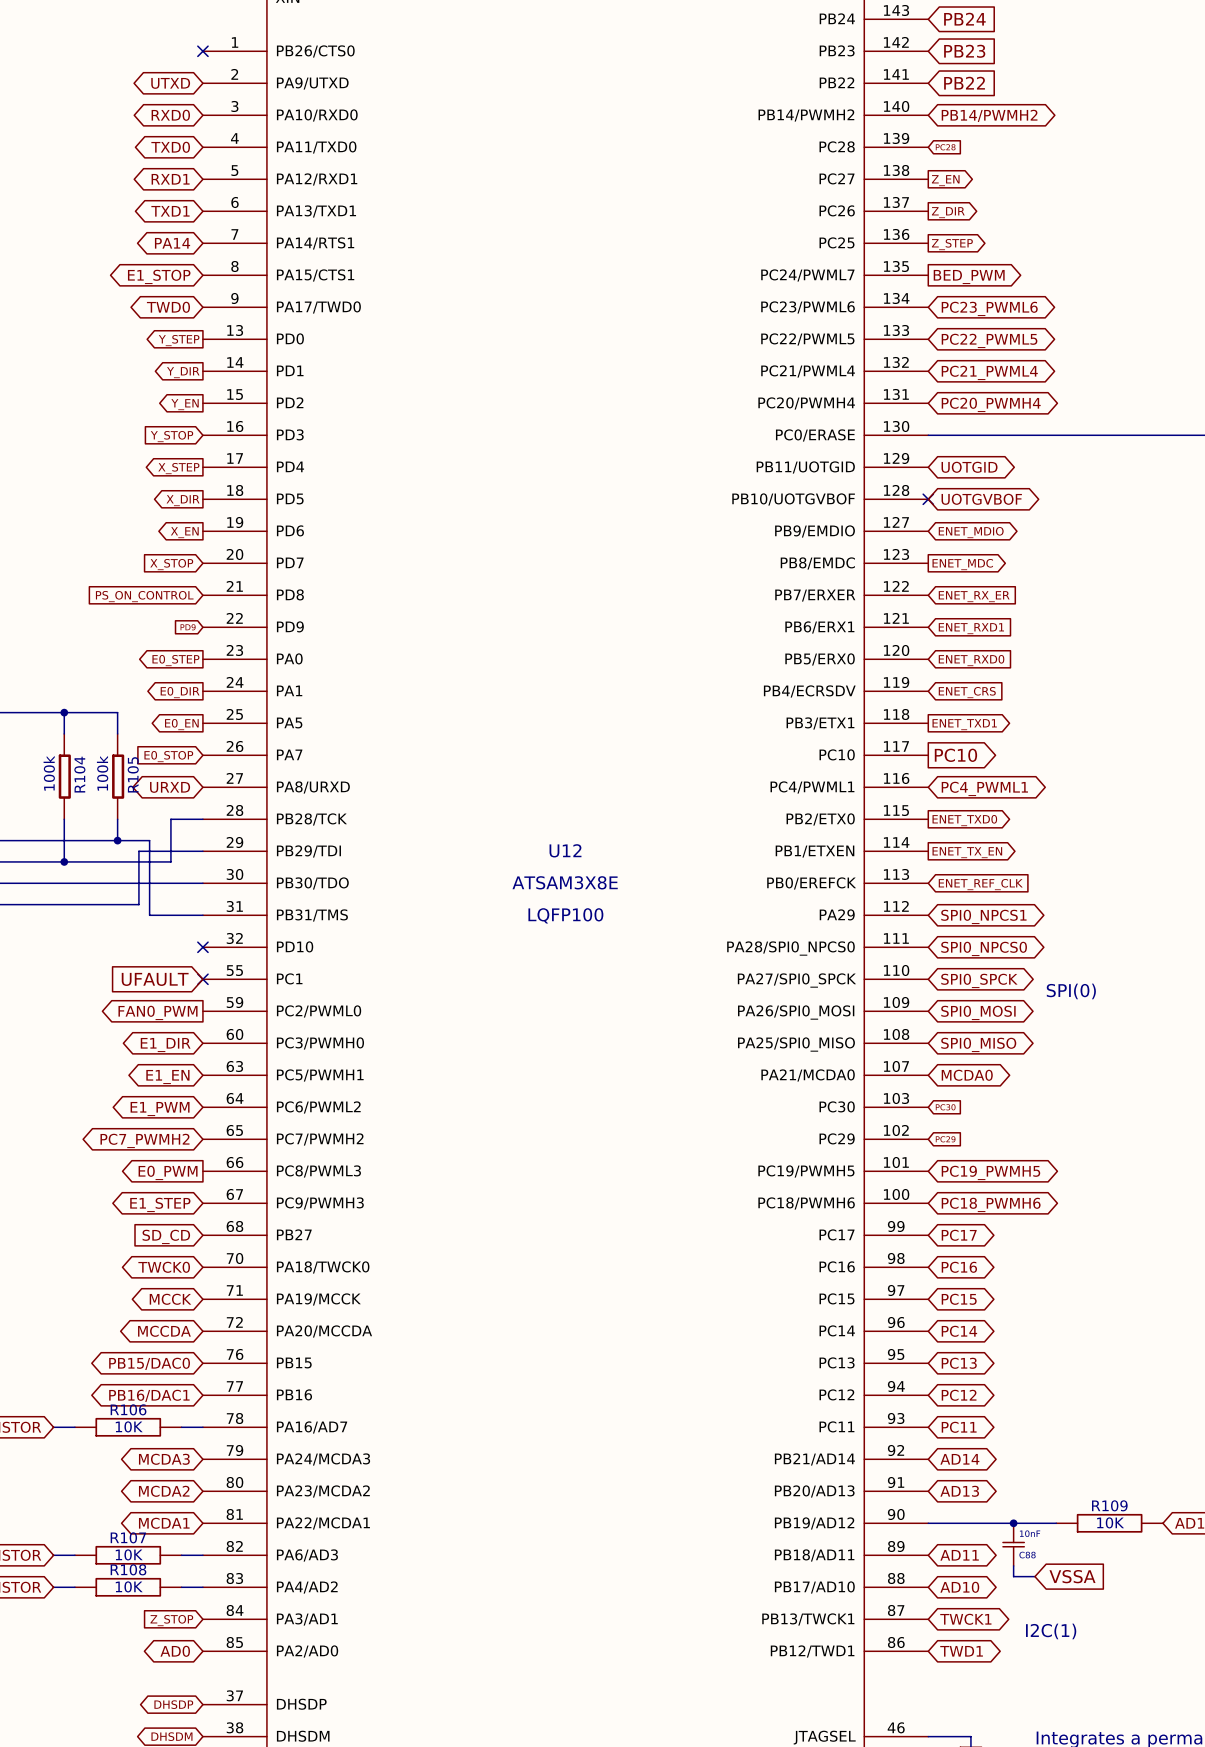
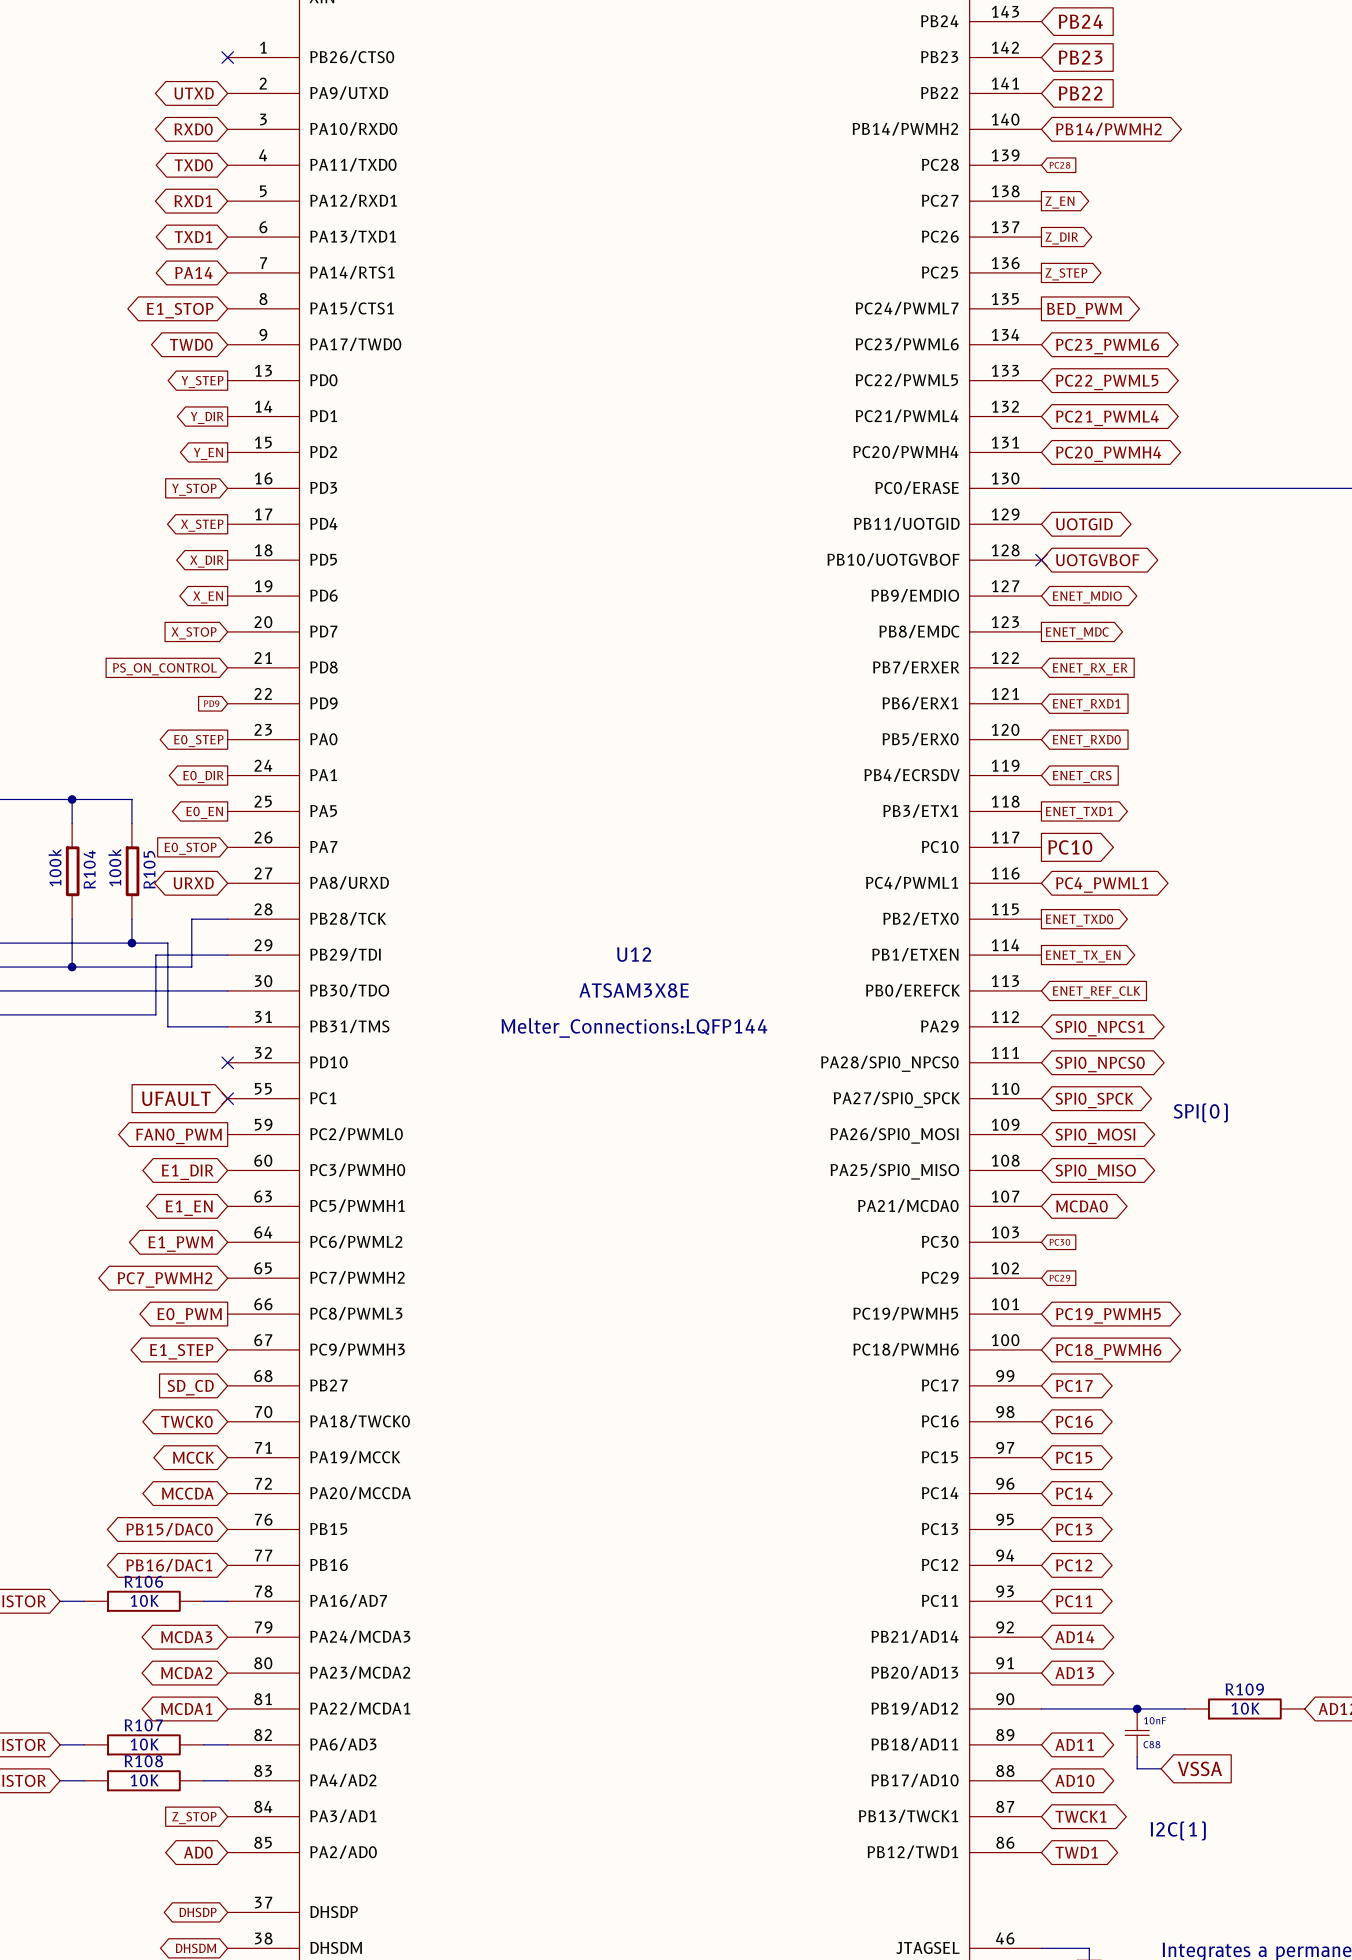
U12 text: LQFP100 (565, 915) -> Melter_Connections:LQFP144 (634, 1028)

